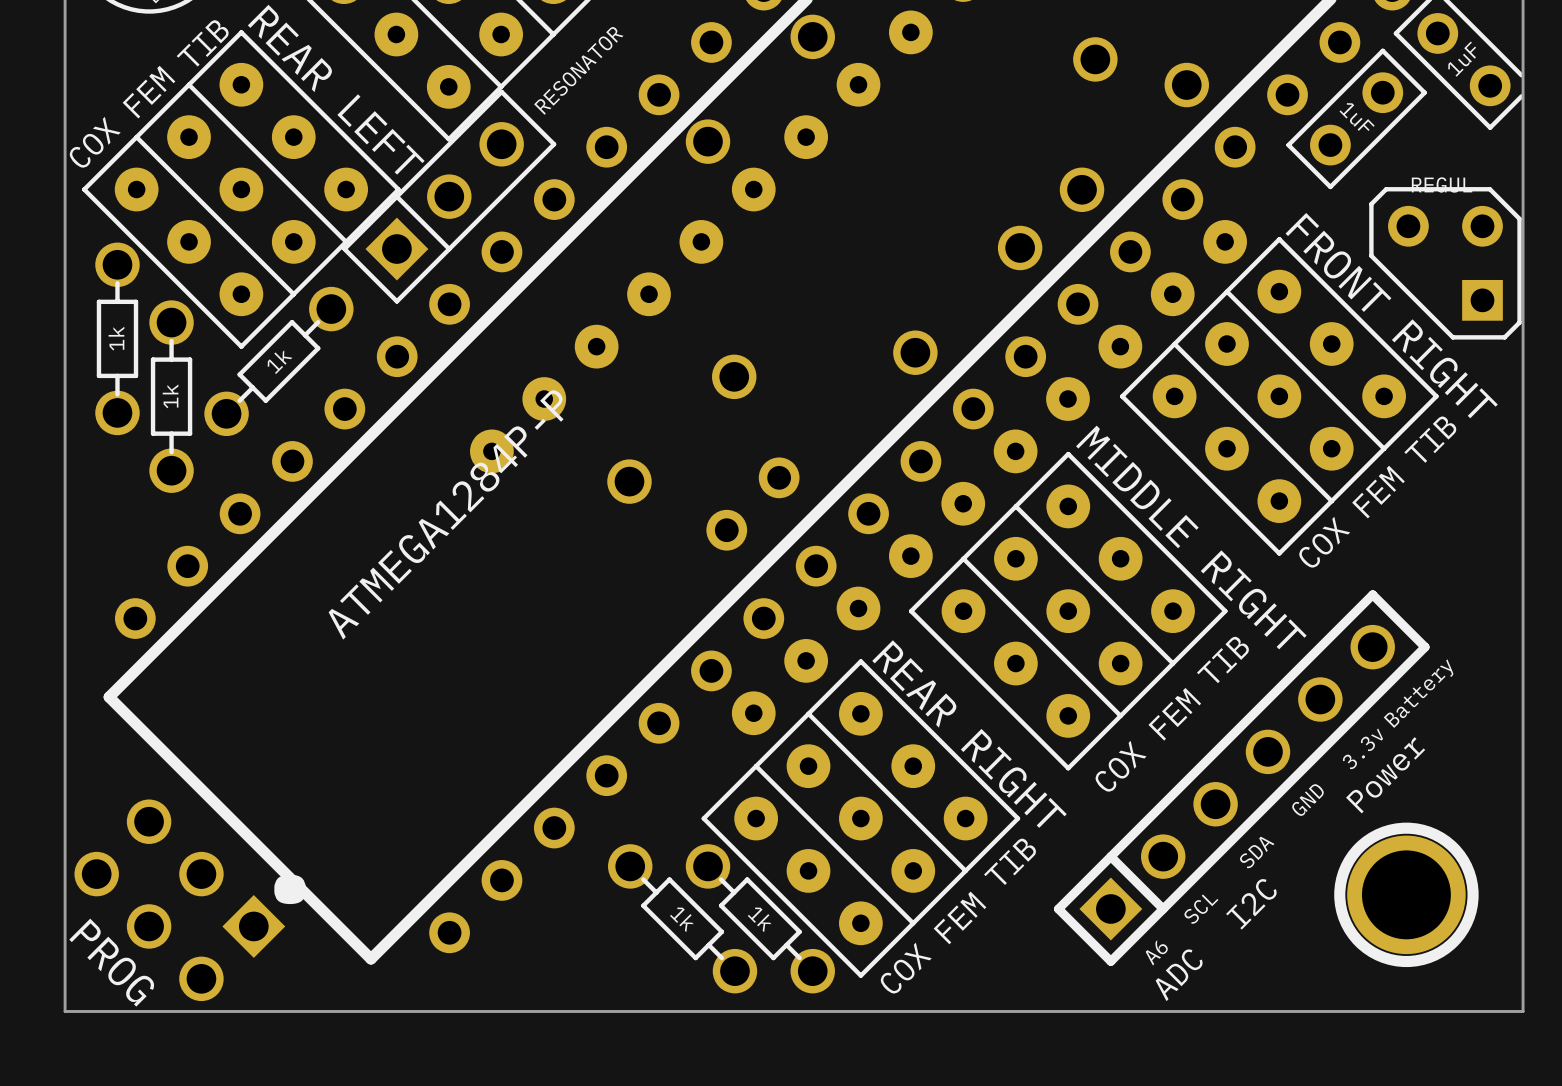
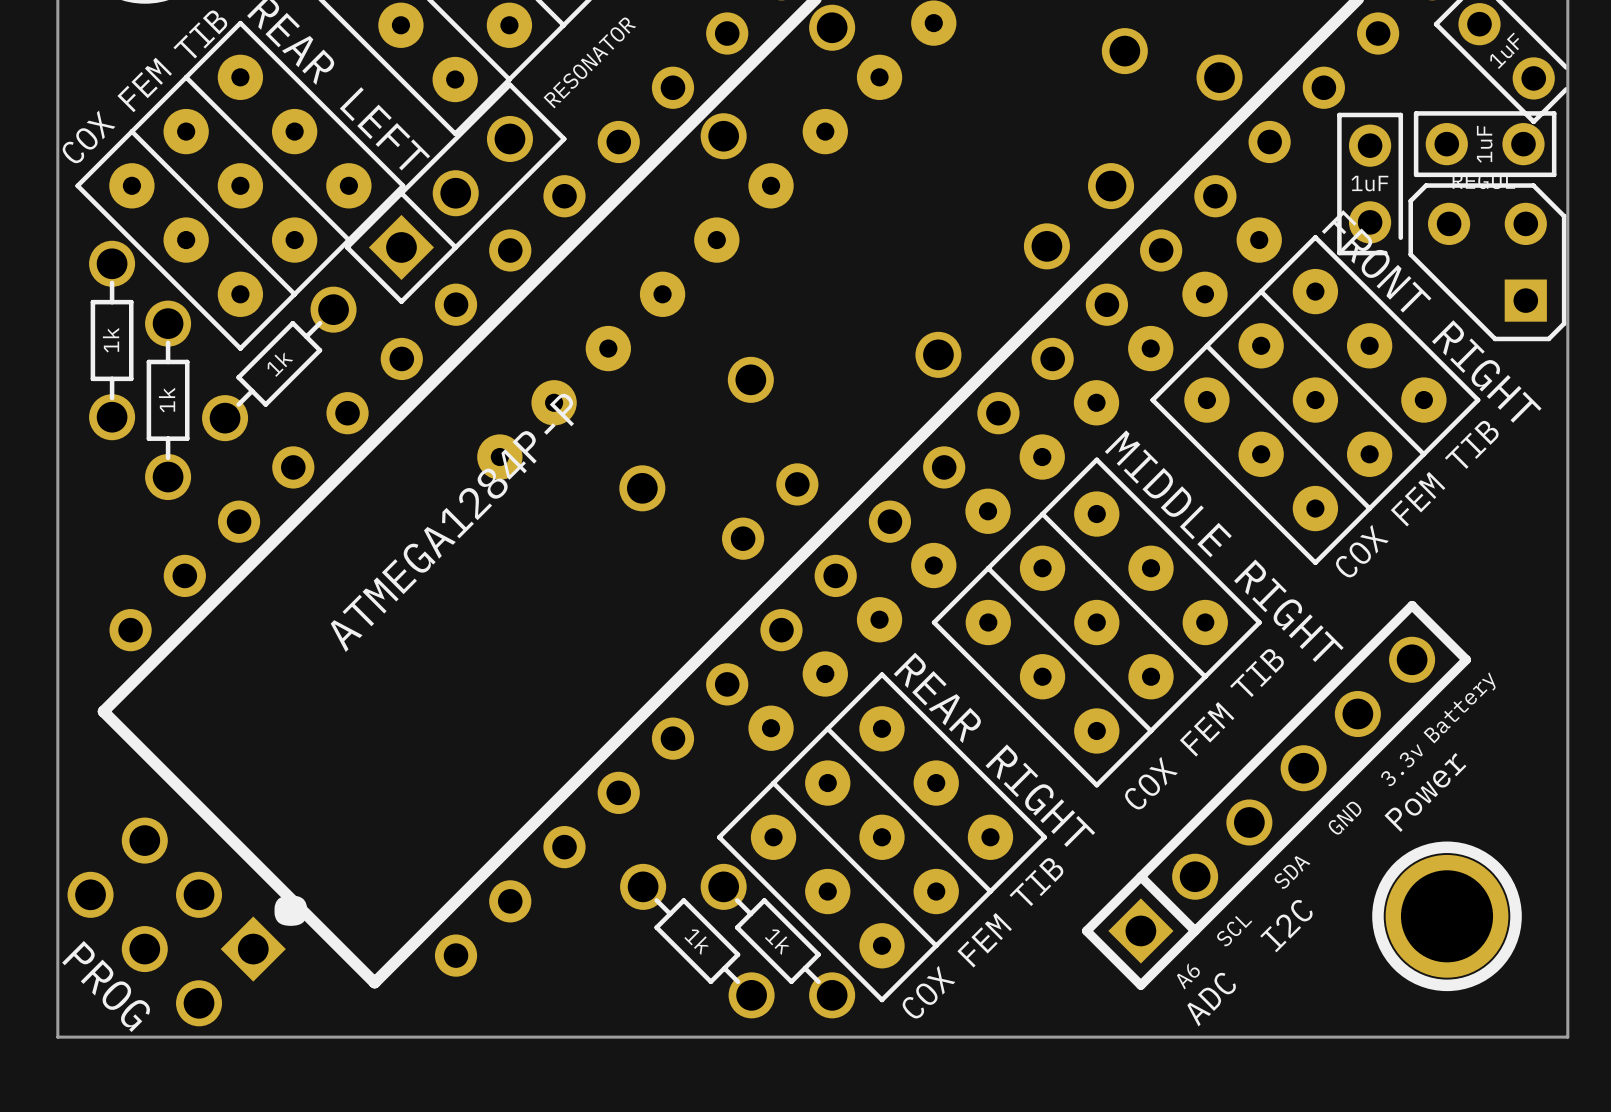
part: 1uF (1356, 118) -> none
part: none -> 1uF (1485, 144)
part: none -> 1uF (1370, 184)

